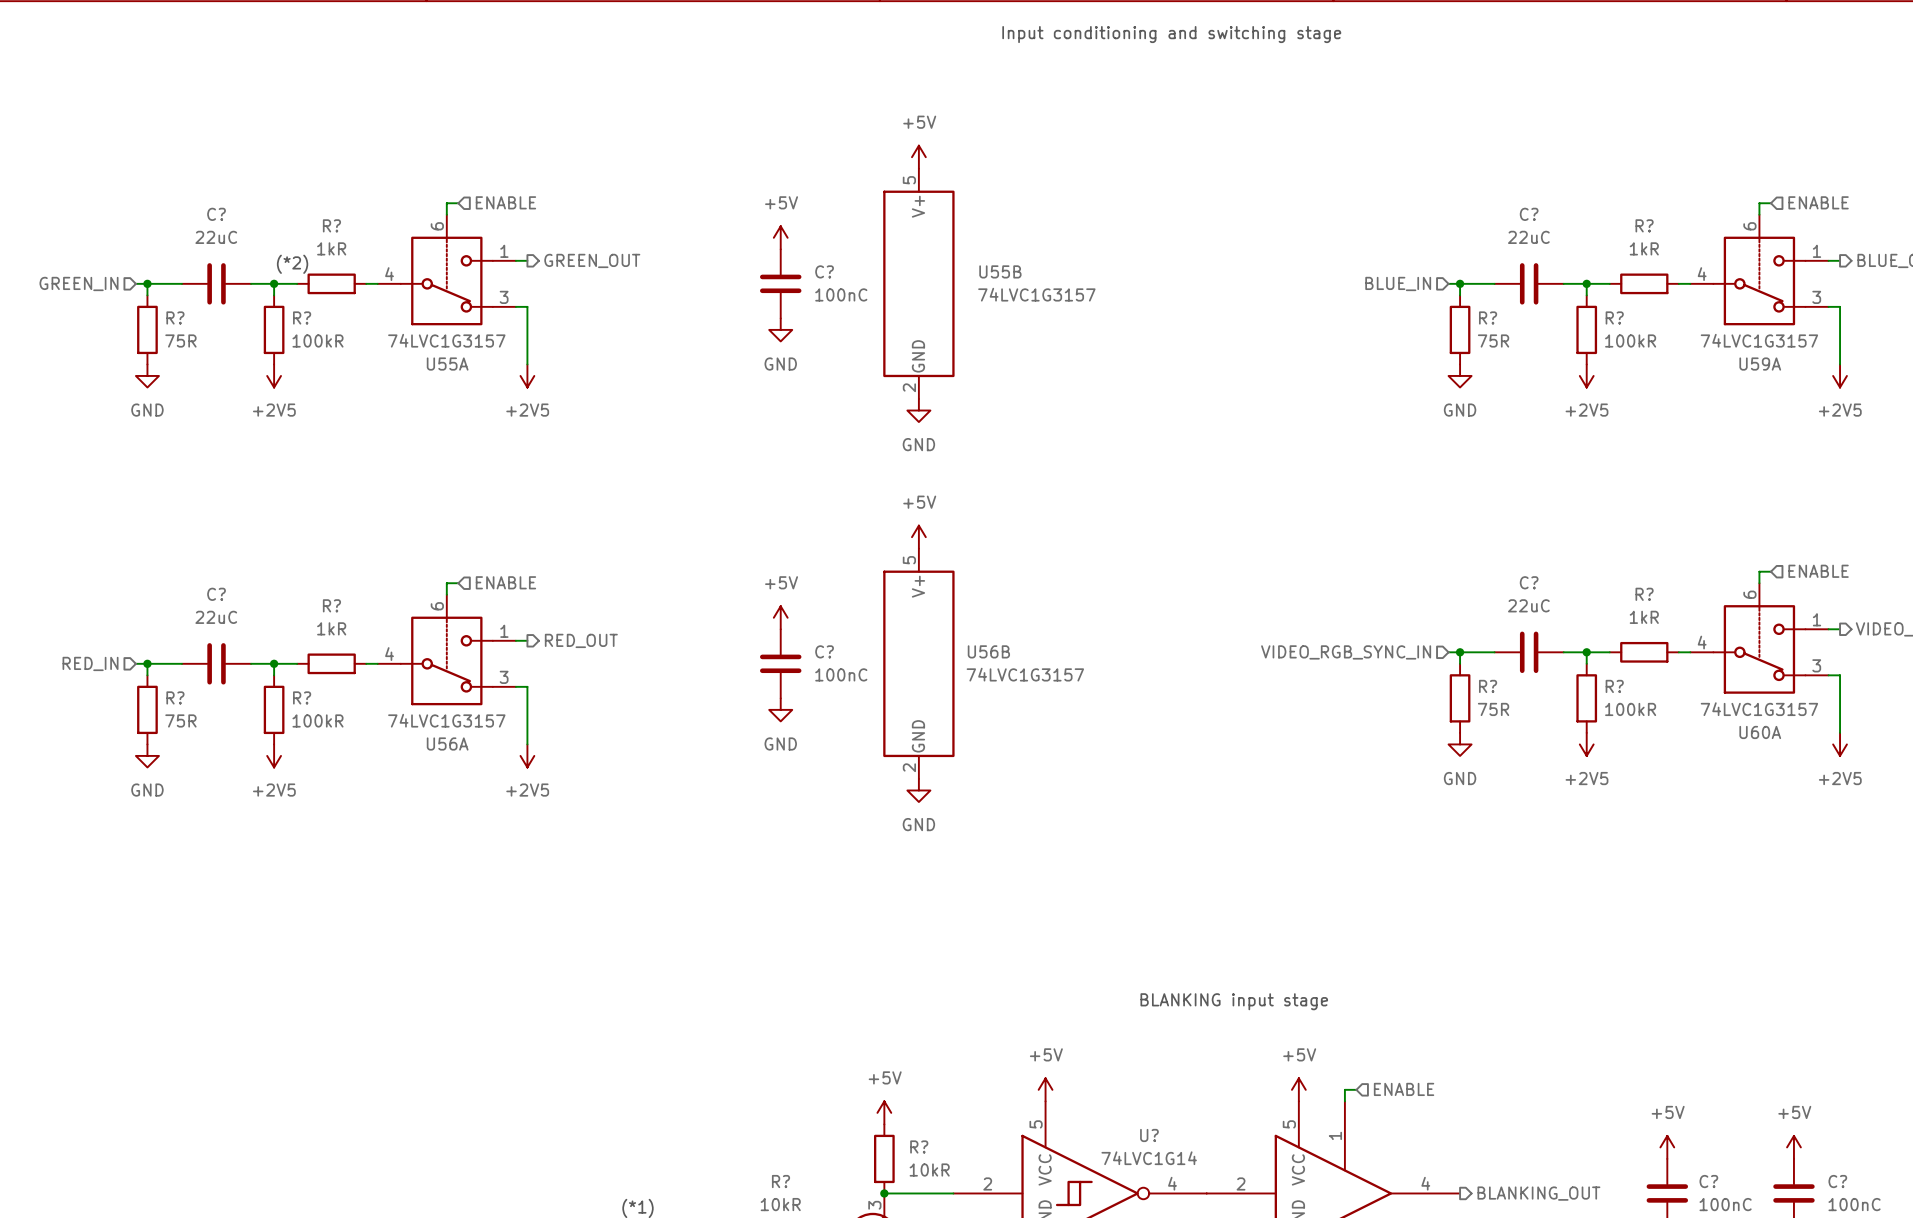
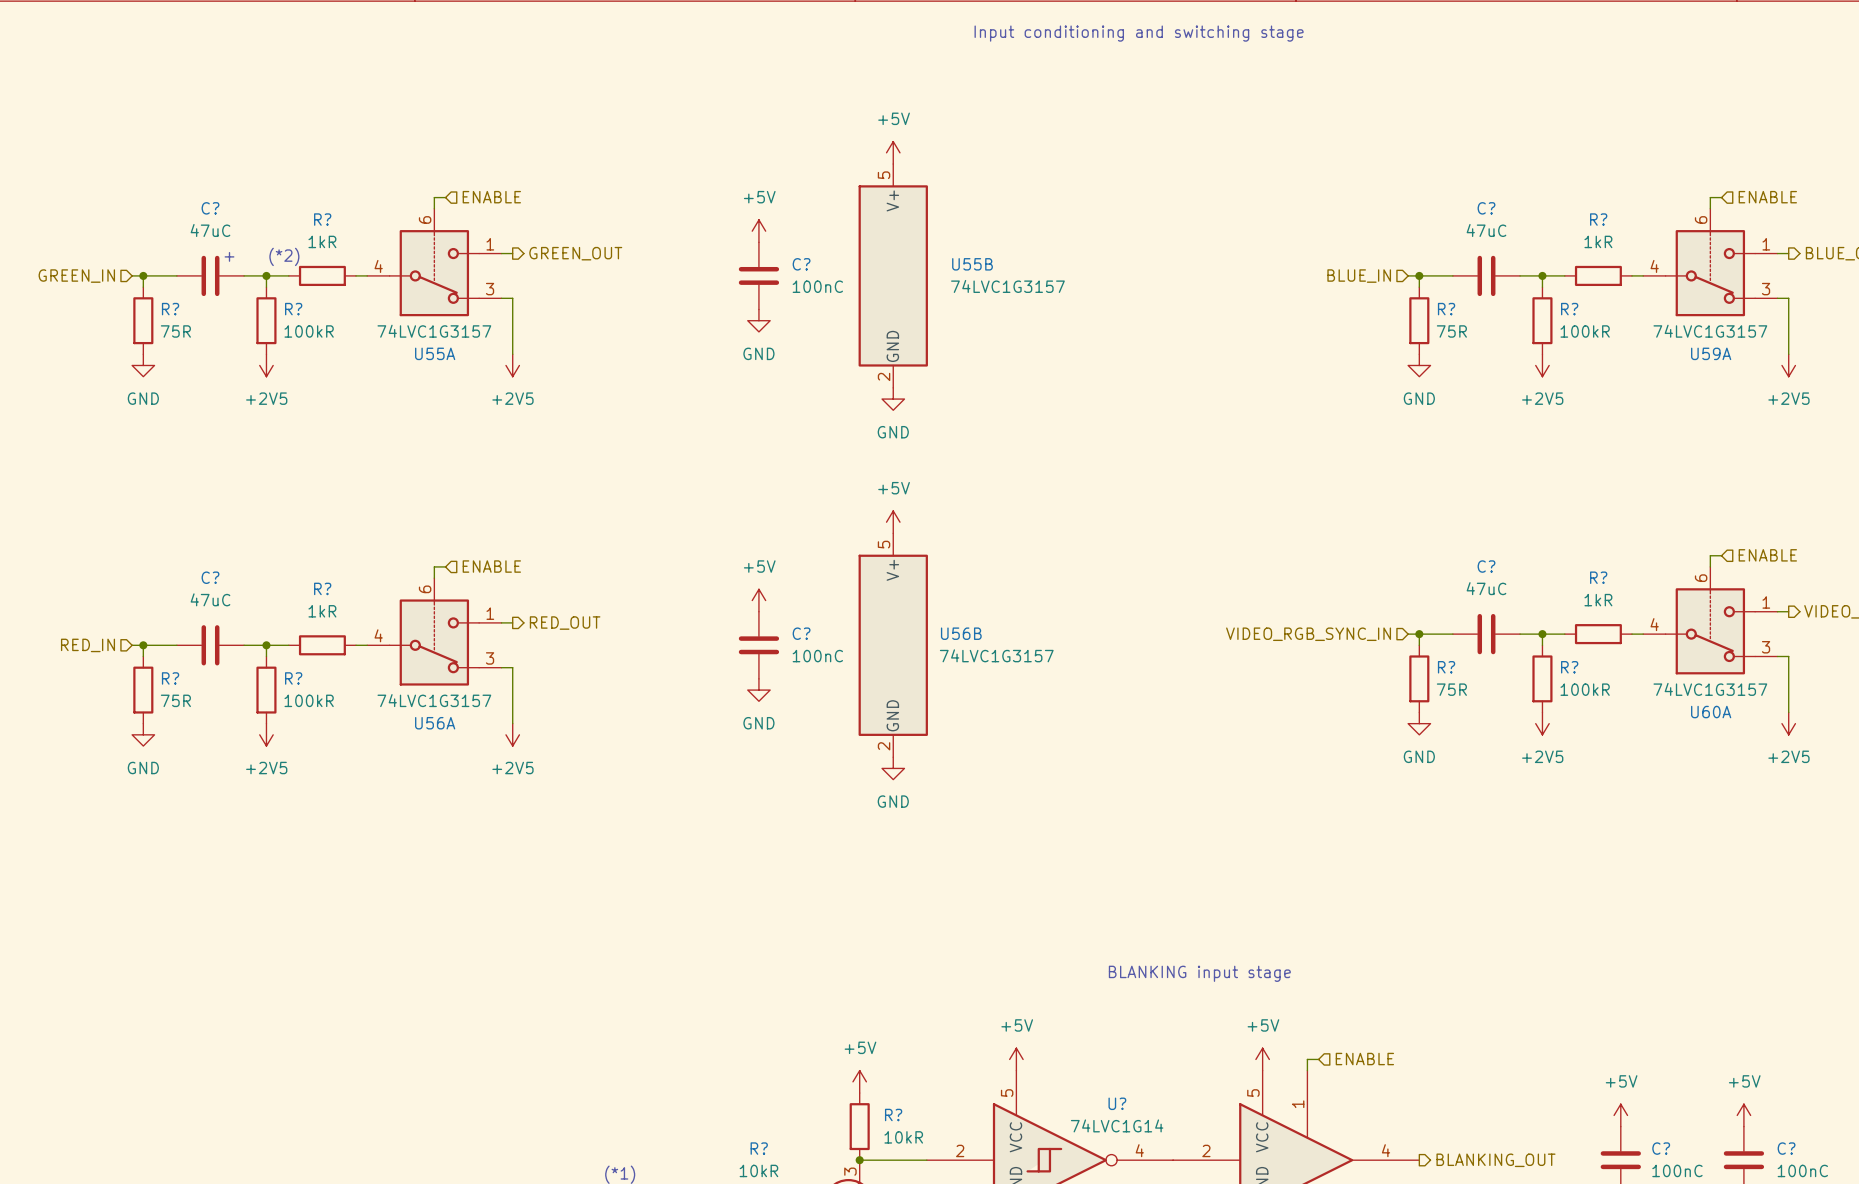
C? value: 22uC (216, 237) -> 47uC (210, 230)
C? value: 22uC (1528, 237) -> 47uC (1486, 230)
text: none -> + (229, 256)
C? value: 22uC (1528, 605) -> 47uC (1486, 588)
C? value: 22uC (216, 617) -> 47uC (210, 599)

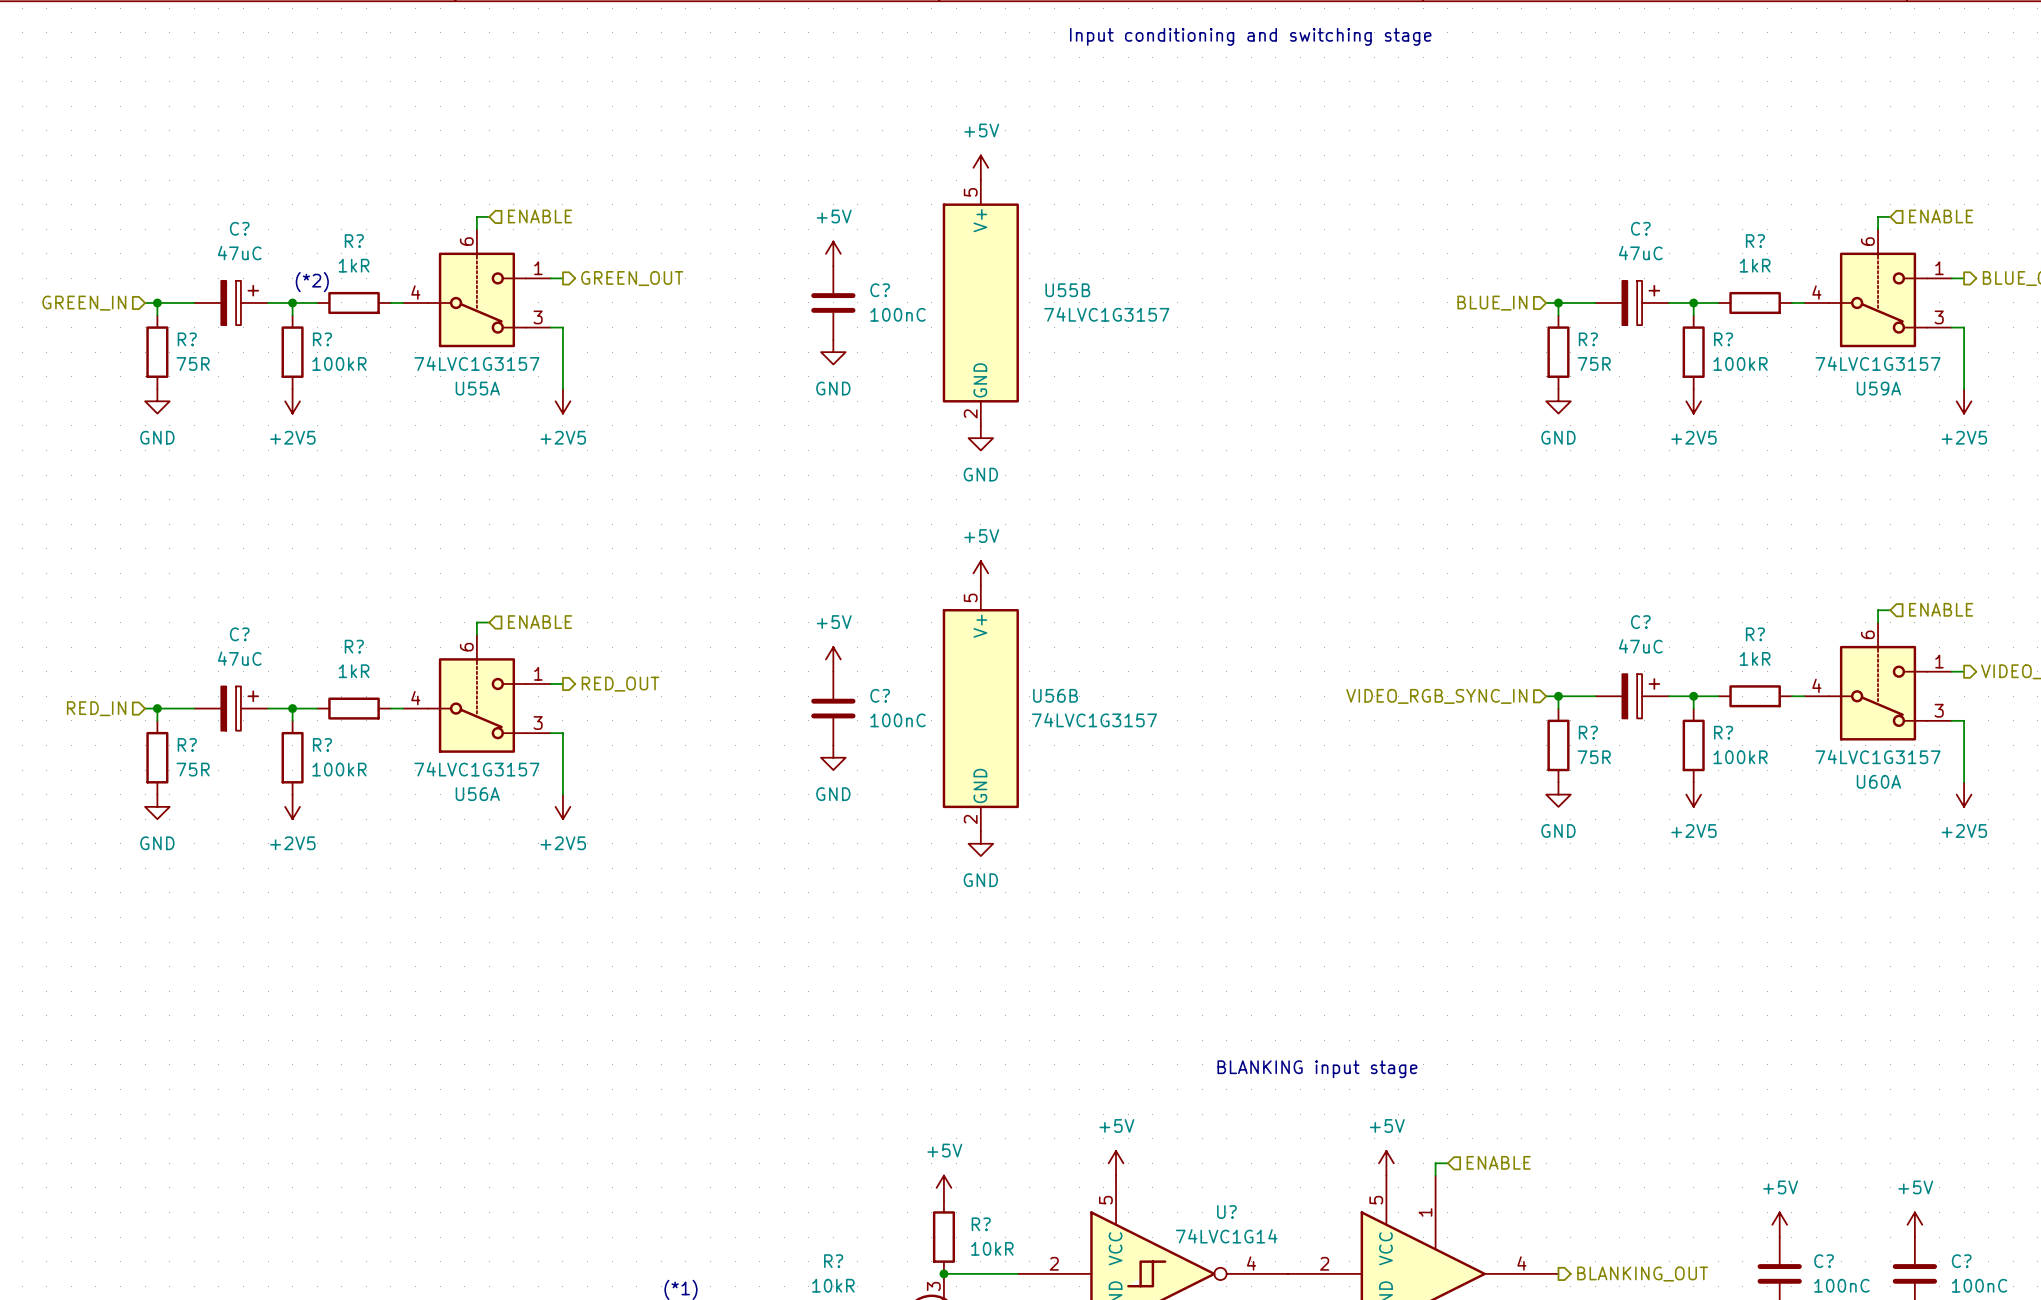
C? symbol: [176, 255, 245, 297] -> [194, 280, 269, 326]
C? symbol: [1452, 255, 1521, 297] -> [1595, 280, 1670, 326]
text: + (229, 256) -> none
C? symbol: [1452, 613, 1521, 655] -> [1595, 674, 1670, 719]
C? symbol: [176, 625, 245, 666] -> [194, 686, 269, 731]

